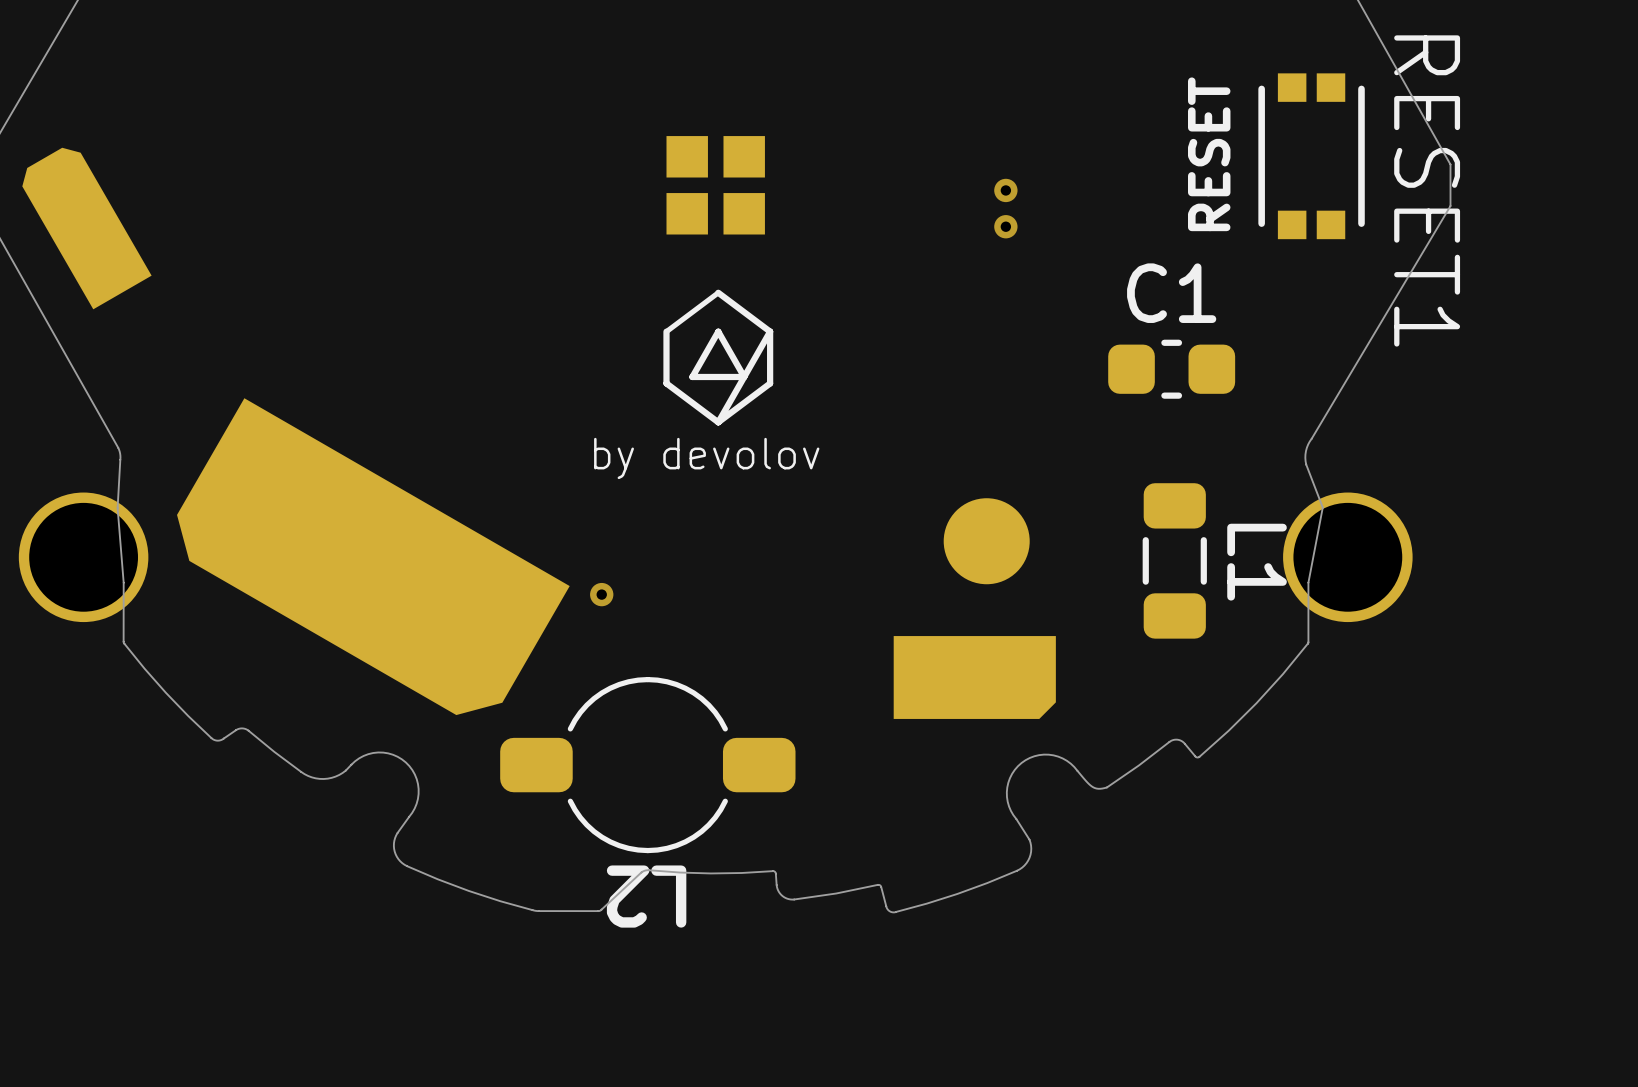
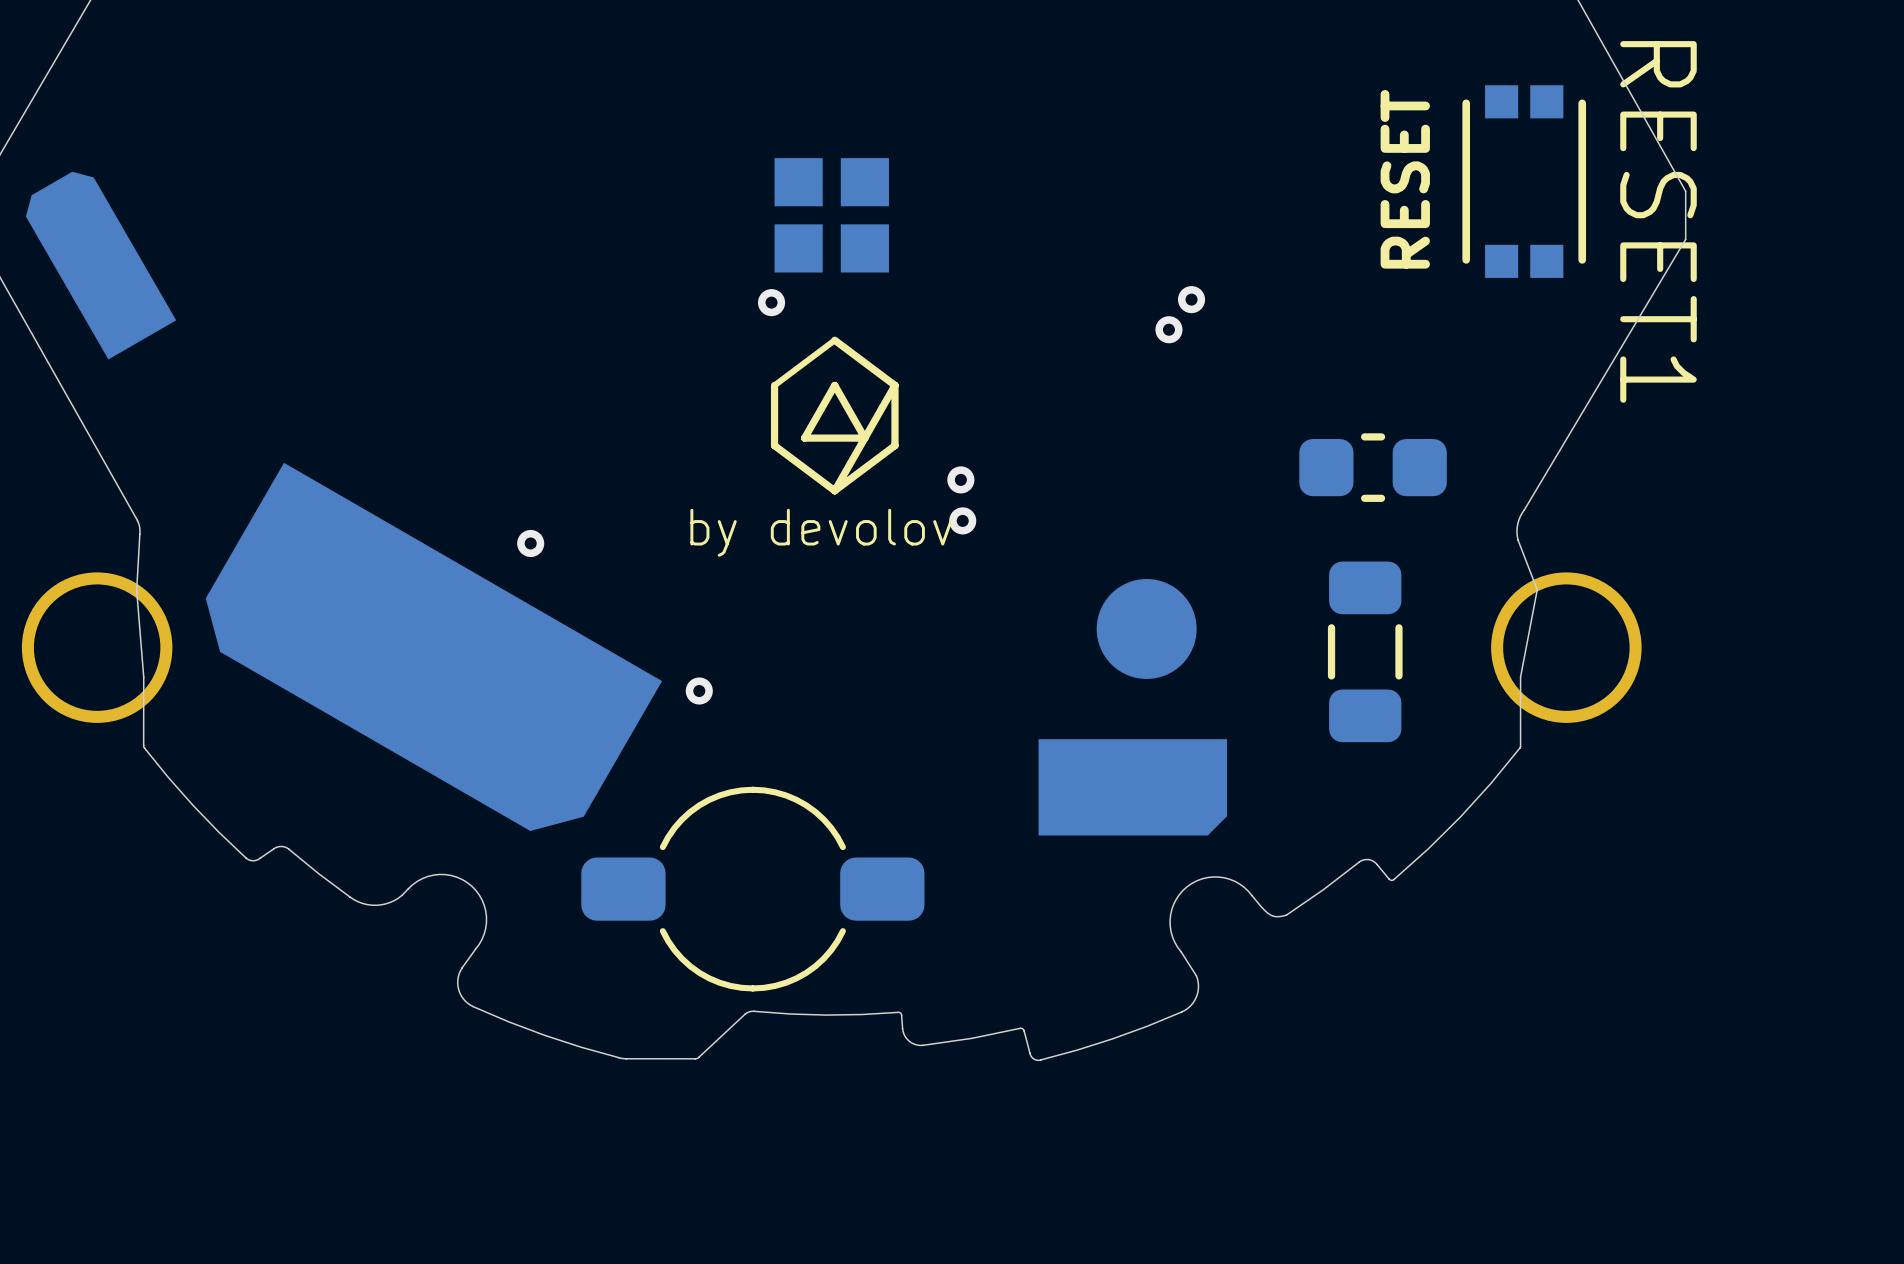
via: (1005, 190) -> none
via: (1005, 226) -> none
via: none -> (1191, 299)
via: none -> (771, 302)
via: none -> (1168, 329)
C1 name: C1 (1171, 293) -> none
C1 position: (1171, 369) -> (1373, 467)
via: none -> (960, 479)
via: none -> (962, 520)
via: none -> (530, 543)
L1 name: L1 (1257, 562) -> none
L2 name: L2 (646, 896) -> none

